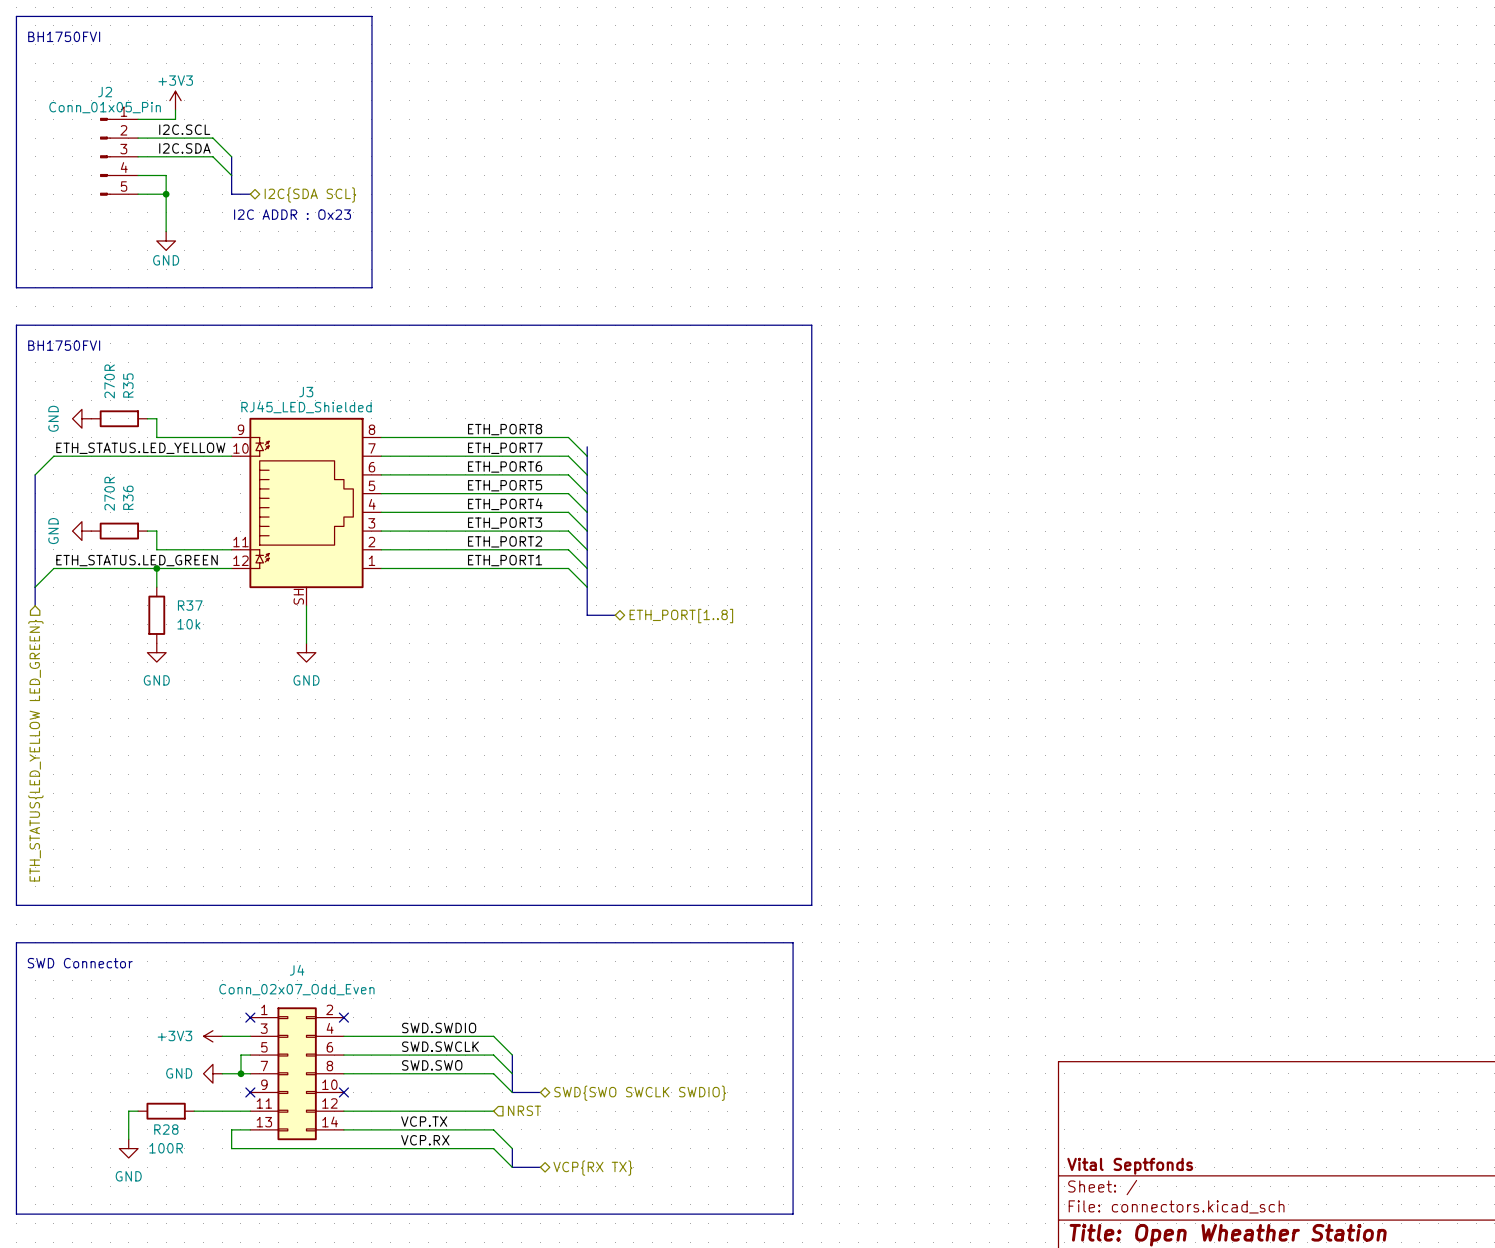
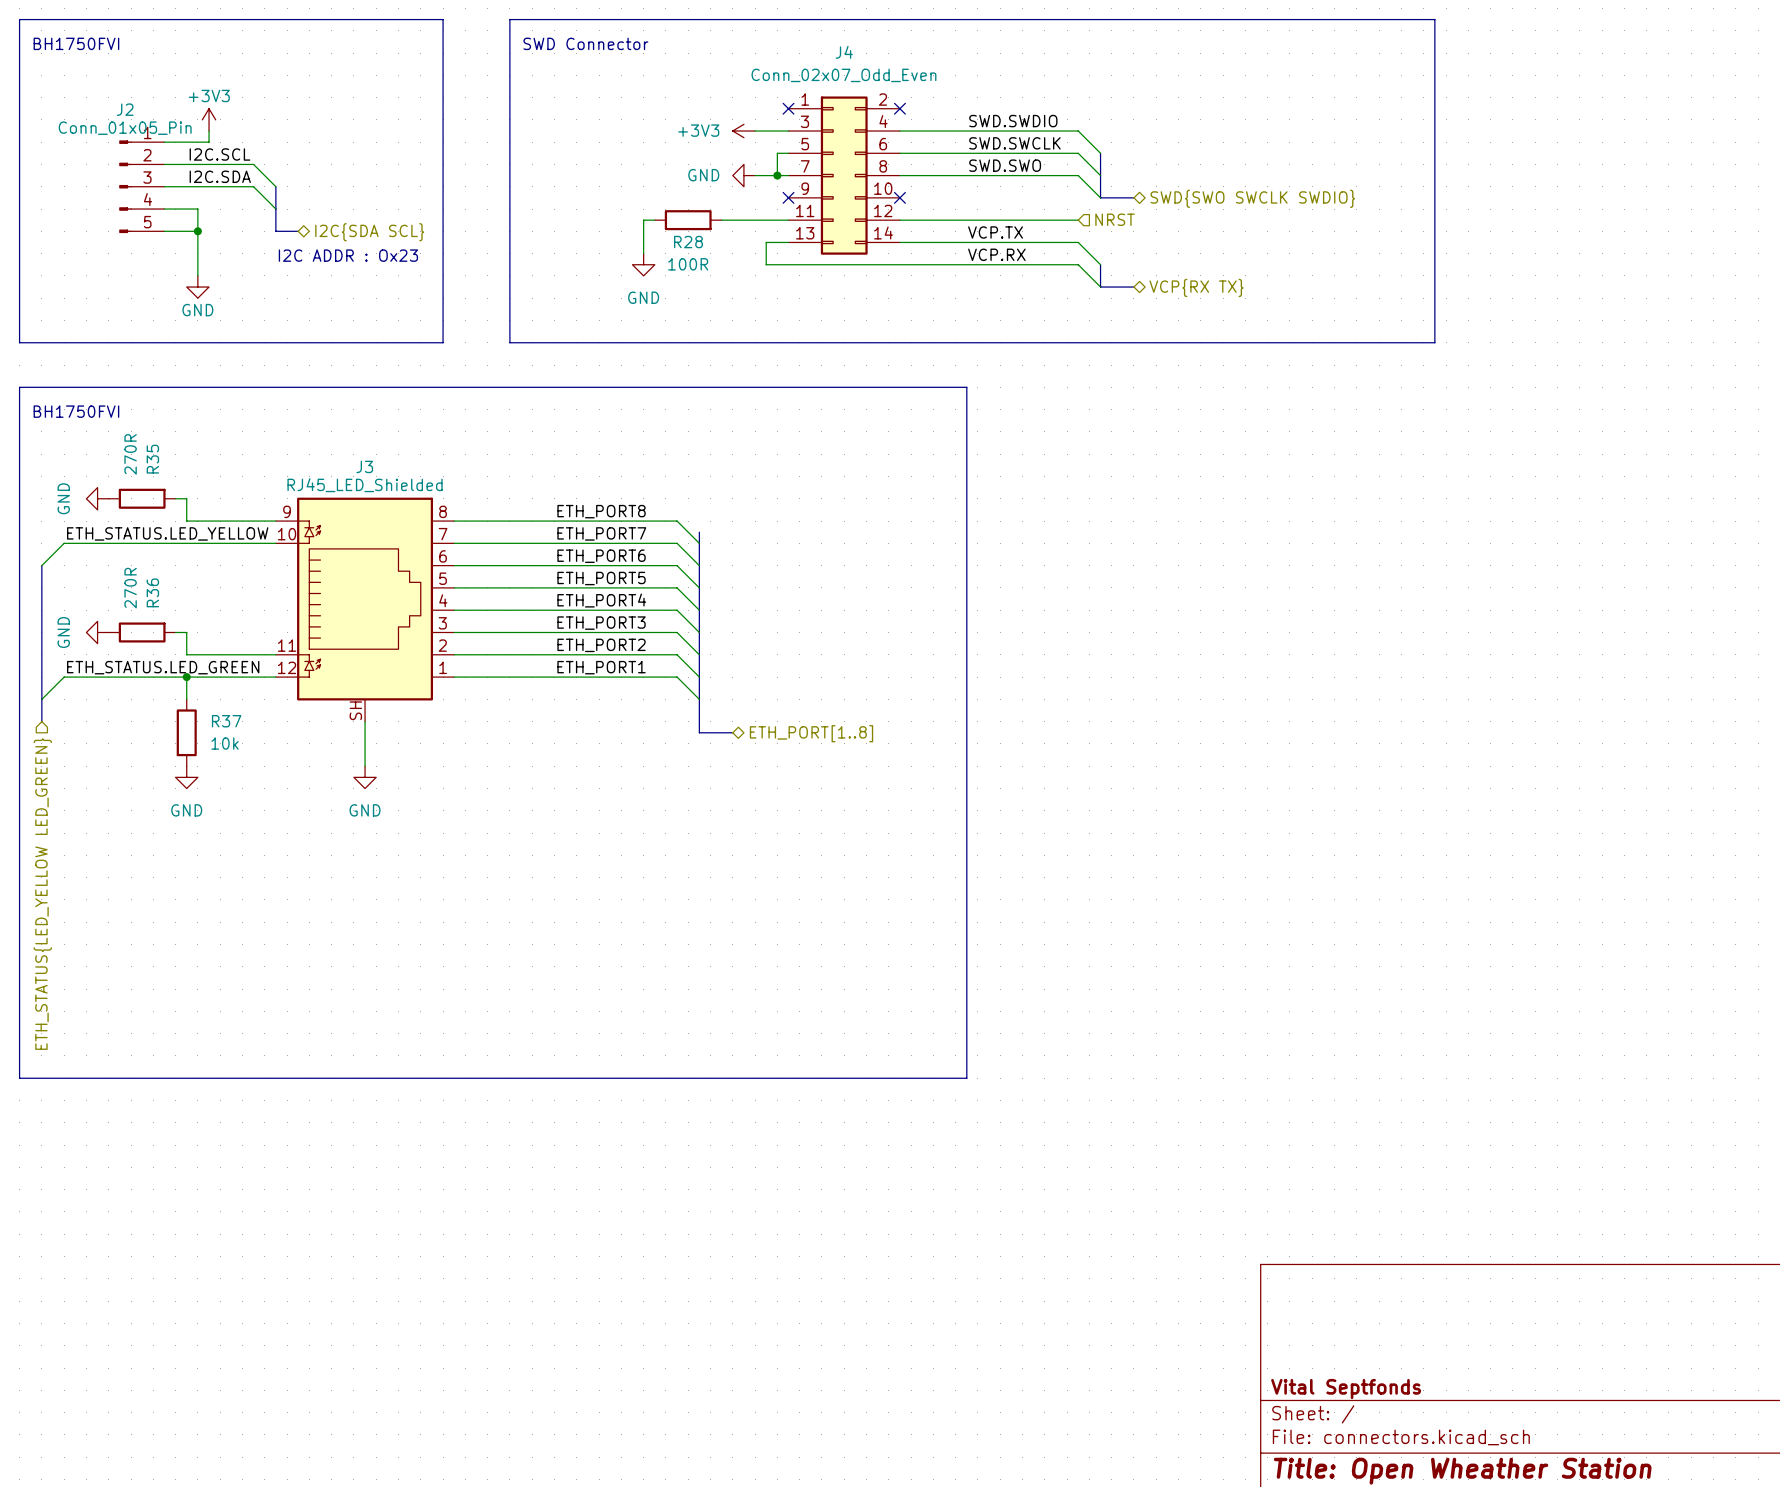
line: none -> (509, 19) (1434, 19) (1434, 342) (509, 342) (509, 19)
text: none -> SWD Connector (585, 43)
no-connect mark: none -> (788, 108)
no-connect mark: none -> (899, 108)
label: none -> SWD.SWDIO (1013, 121)
power symbol: none -> +3V3 (743, 131)
wire: none -> (755, 131) (788, 131)
wire: none -> (899, 131) (1078, 131) (1100, 153)
label: none -> SWD.SWCLK (1014, 143)
wire: none -> (788, 153) (777, 153) (777, 175)
wire: none -> (899, 153) (1078, 153) (1100, 175)
bus: none -> (1100, 153) (1100, 197) (1133, 197)
label: none -> SWD.SWO (1005, 165)
power symbol: none -> GND (743, 175)
wire: none -> (755, 175) (788, 175)
junction: none -> (777, 175)
wire: none -> (899, 175) (1078, 175) (1100, 197)
no-connect mark: none -> (788, 197)
no-connect mark: none -> (899, 197)
hierarchical label: none -> SWD{SWO SWCLK SWDIO} (1252, 198)
wire: none -> (654, 220) (643, 220) (643, 253)
wire: none -> (721, 220) (788, 220)
wire: none -> (899, 220) (1078, 220)
hierarchical label: none -> NRST (1115, 219)
label: none -> VCP.TX (995, 232)
wire: none -> (788, 242) (766, 242) (766, 264) (1078, 264) (1100, 287)
wire: none -> (899, 242) (1078, 242) (1100, 264)
label: none -> VCP.RX (996, 254)
power symbol: none -> GND (643, 264)
bus: none -> (1100, 264) (1100, 287) (1133, 287)
hierarchical label: none -> VCP{RX TX} (1196, 287)
line: (16, 942) (793, 942) (793, 1214) (16, 1214) (16, 942) -> none
text: SWD Connector (80, 963) -> none
no-connect mark: (250, 1017) -> none
no-connect mark: (343, 1017) -> none
label: SWD.SWDIO (439, 1027) -> none
power symbol: +3V3 (212, 1036) -> none
wire: (222, 1036) (250, 1036) -> none
wire: (343, 1036) (493, 1036) (512, 1055) -> none
label: SWD.SWCLK (440, 1046) -> none
wire: (250, 1055) (240, 1055) (240, 1073) -> none
wire: (343, 1055) (493, 1055) (512, 1073) -> none
bus: (512, 1055) (512, 1092) (540, 1092) -> none
label: SWD.SWO (432, 1065) -> none
power symbol: GND (212, 1073) -> none
wire: (222, 1073) (250, 1073) -> none
junction: (240, 1073) -> none
J4 position: (297, 1073) -> (844, 175)
wire: (343, 1073) (493, 1073) (512, 1092) -> none
no-connect mark: (250, 1092) -> none
no-connect mark: (343, 1092) -> none
hierarchical label: SWD{SWO SWCLK SWDIO} (640, 1093) -> none
hierarchical label: NRST (524, 1110) -> none
wire: (138, 1111) (128, 1111) (128, 1139) -> none
R28 position: (166, 1111) -> (688, 220)
wire: (194, 1111) (250, 1111) -> none
wire: (343, 1111) (493, 1111) -> none
label: VCP.TX (424, 1121) -> none
wire: (250, 1129) (231, 1129) (231, 1148) (493, 1148) (512, 1167) -> none
wire: (343, 1129) (493, 1129) (512, 1148) -> none
label: VCP.RX (425, 1140) -> none
power symbol: GND (128, 1148) -> none
bus: (512, 1148) (512, 1167) (540, 1167) -> none
hierarchical label: VCP{RX TX} (592, 1168) -> none

